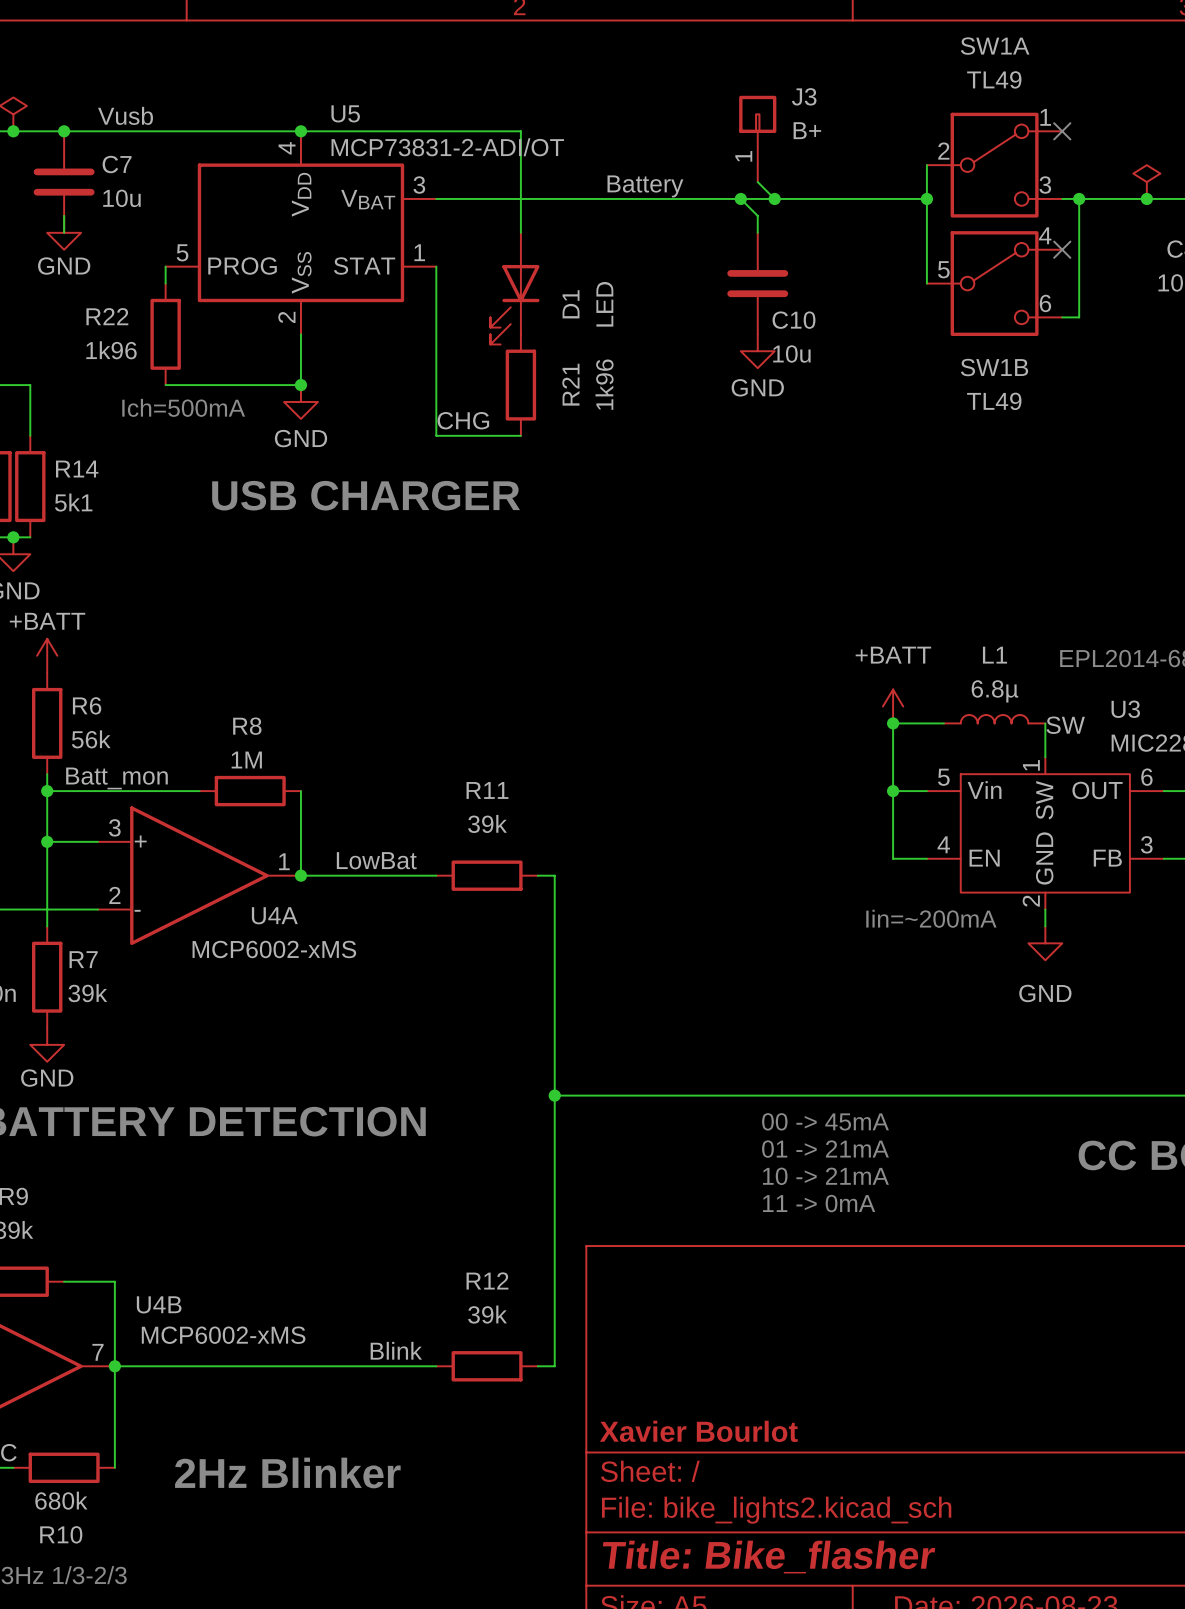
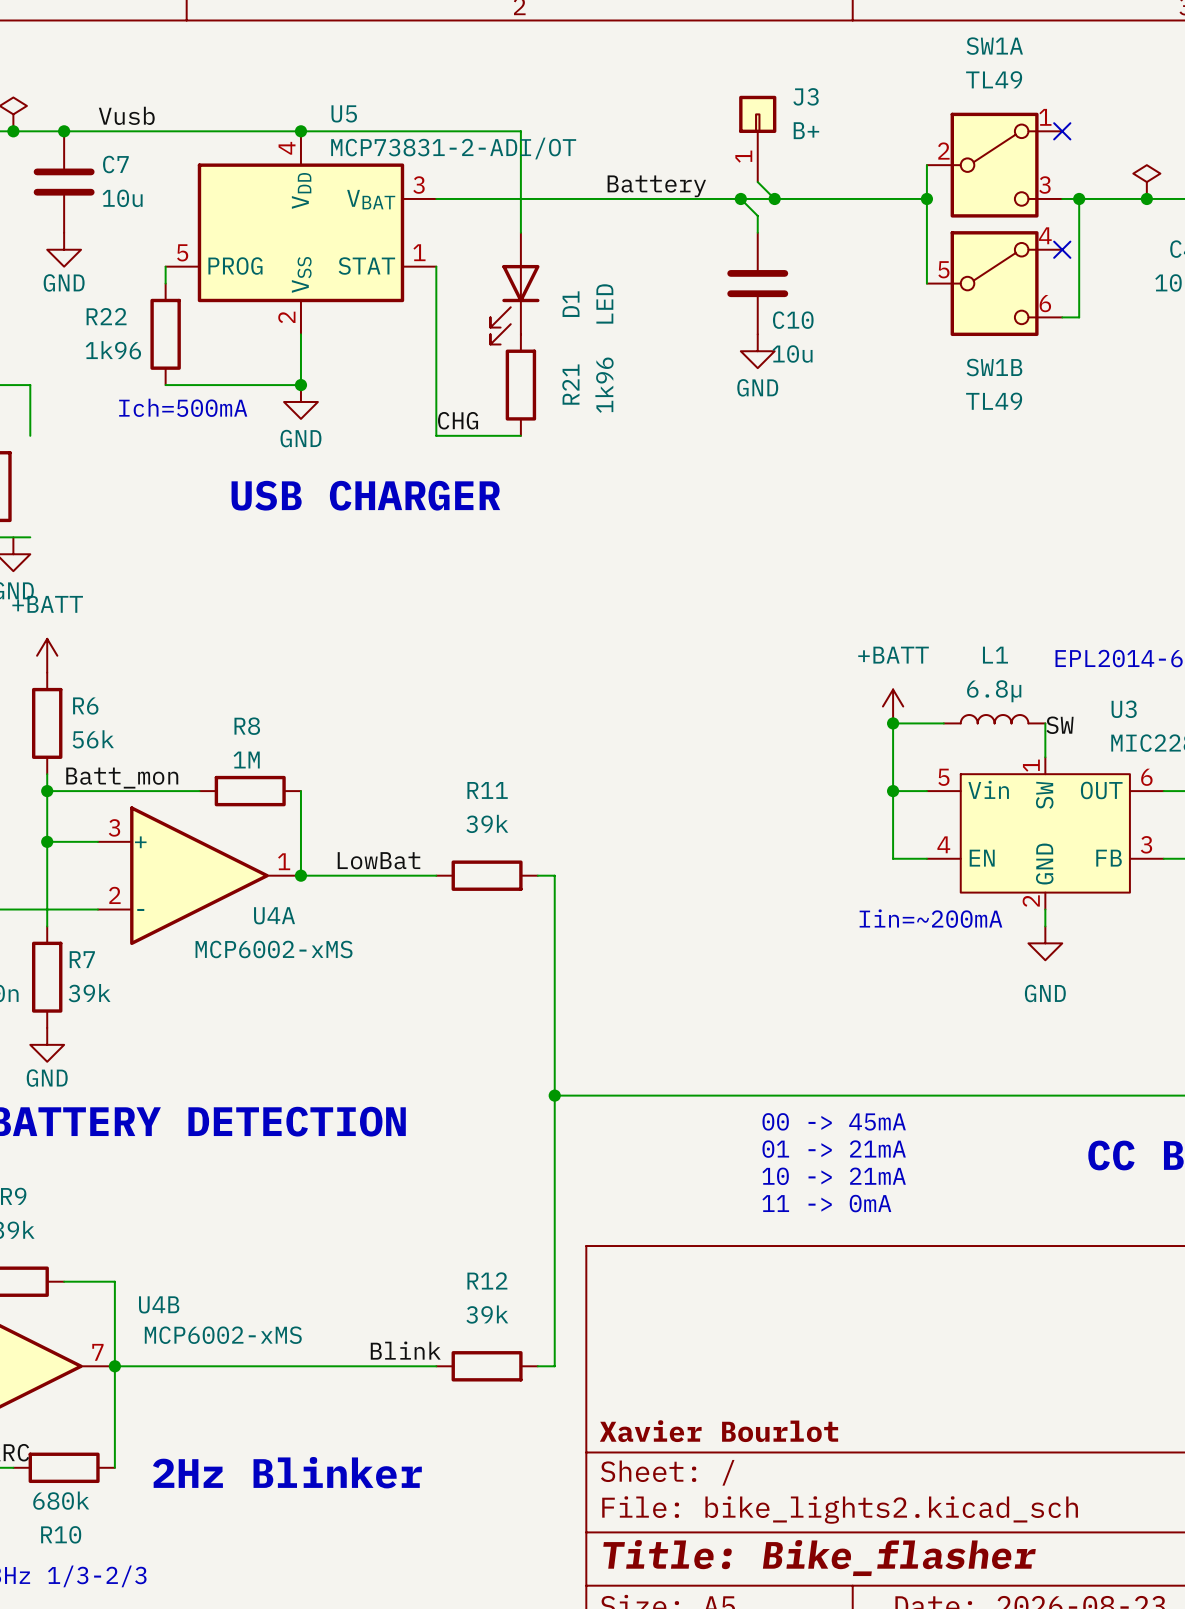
power symbol position: GND (64, 232) -> GND (64, 249)
R14: 5k1 (30, 486) -> none
junction: (13, 537) -> none
power symbol text position: +BATT (47, 621) -> +BATT (47, 604)

